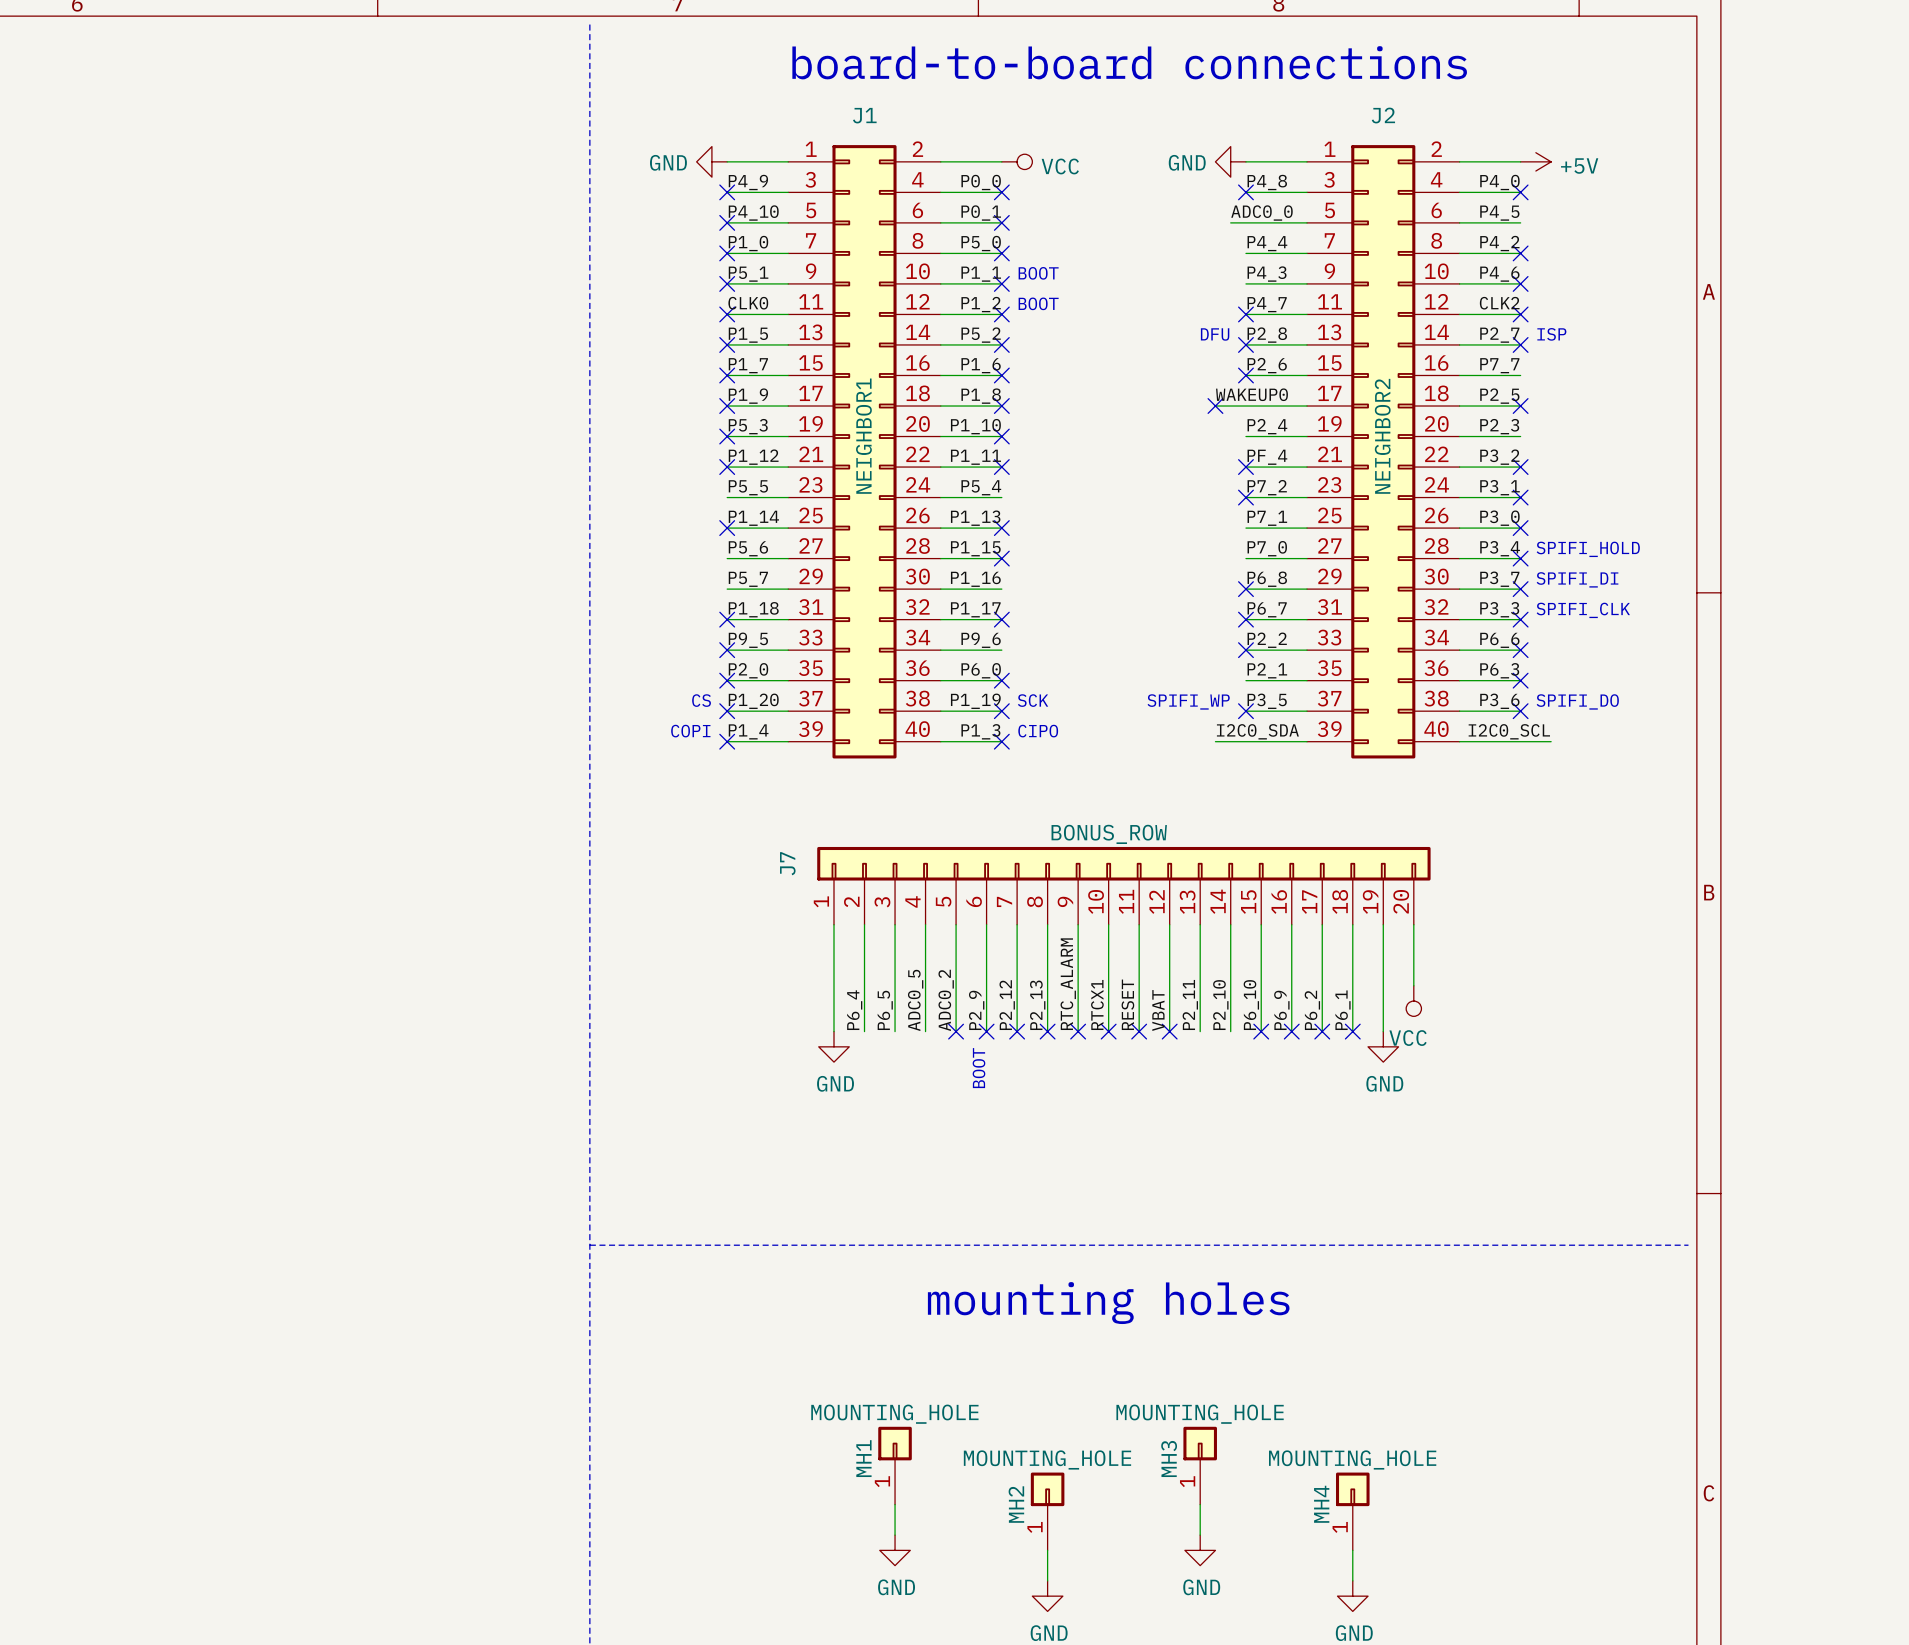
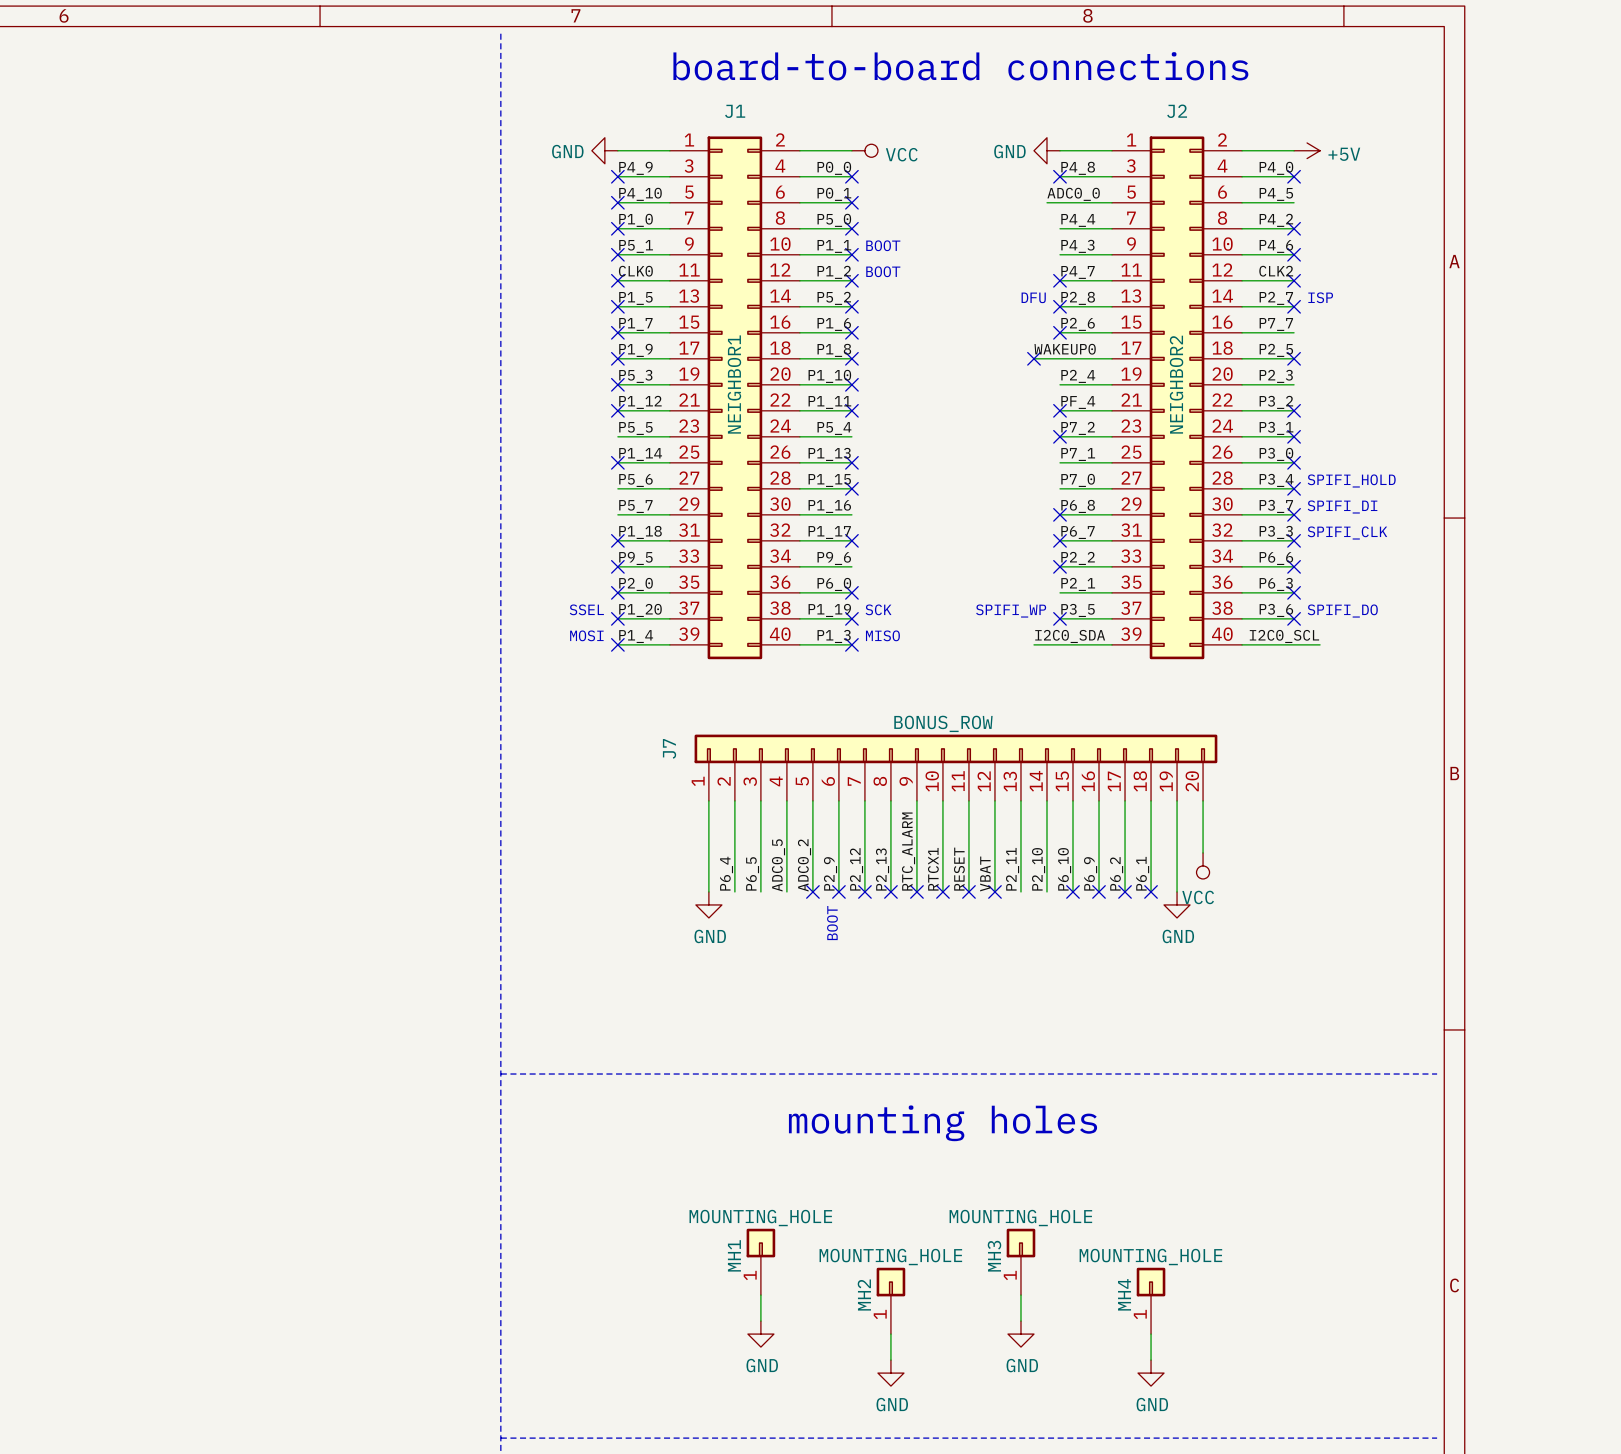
text: CS (701, 700) -> SSEL (586, 609)
text: COPI (690, 731) -> MOSI (586, 635)
text: CIPO (1038, 731) -> MISO (882, 635)

